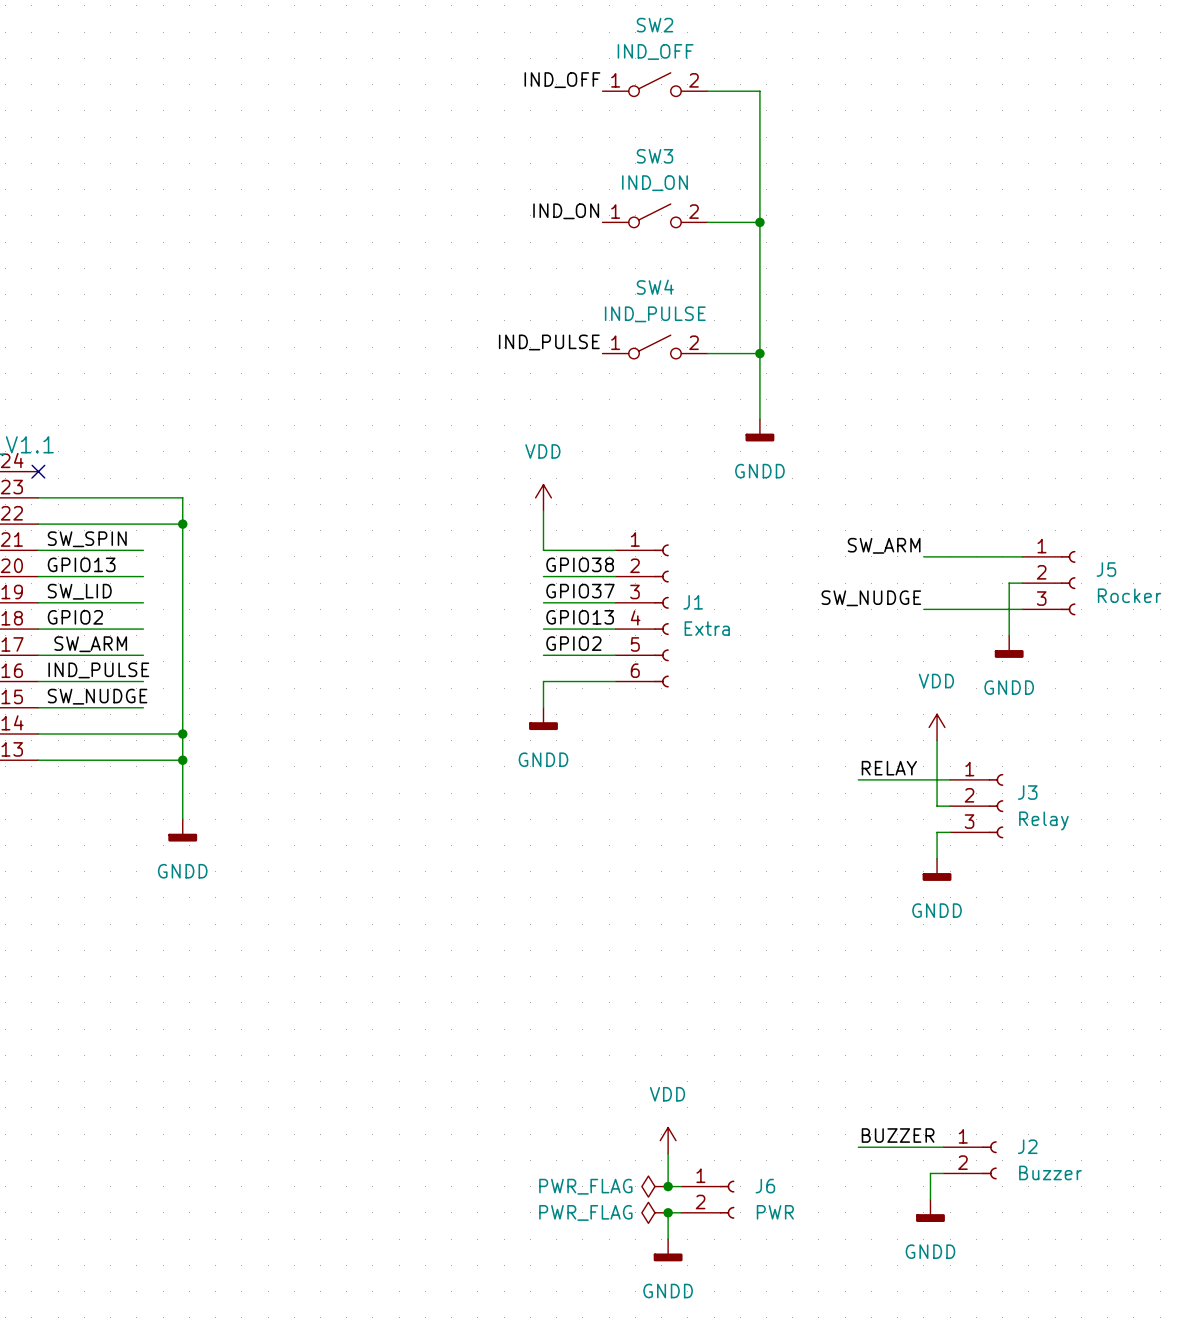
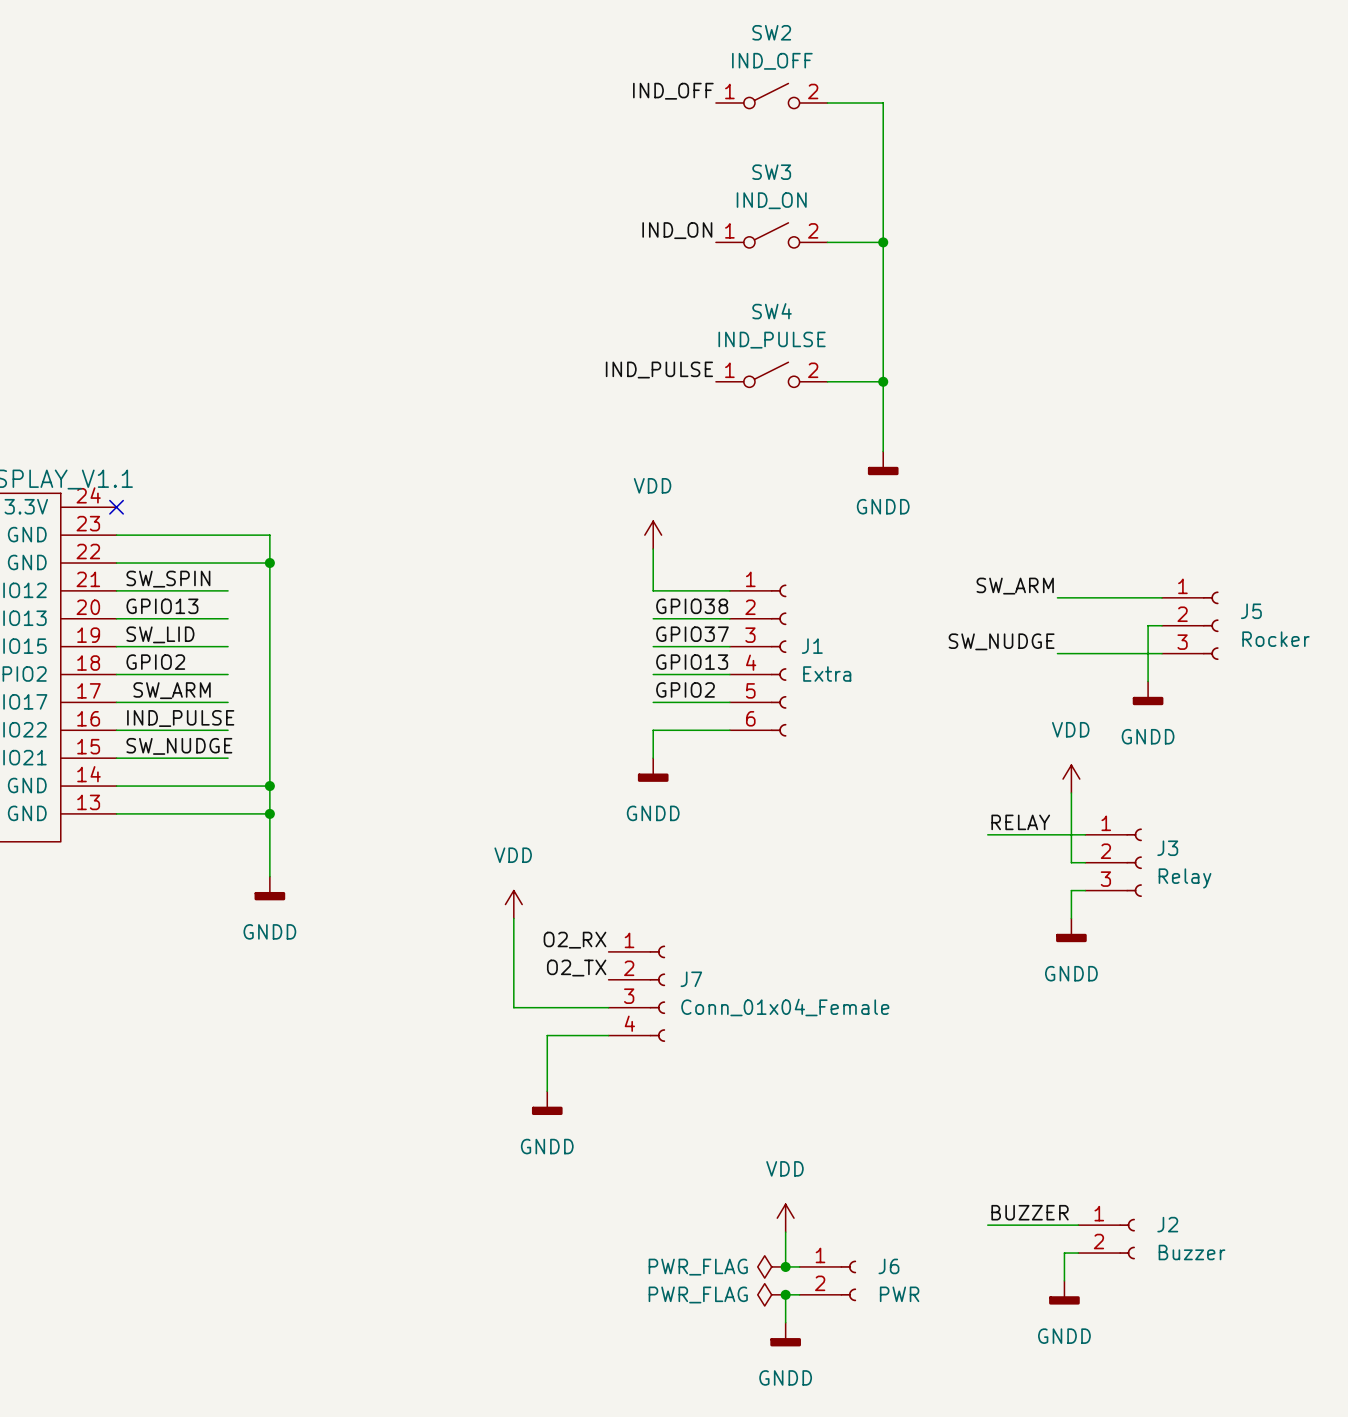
power symbol: none -> VDD (513, 904)
wire: none -> (513, 918) (513, 1007) (608, 1007)
label: none -> O2_RX (574, 940)
label: none -> O2_TX (576, 968)
J7: none -> Conn_01x04_Female (636, 993)
wire: none -> (608, 1035) (547, 1035) (547, 1091)
power symbol: none -> GNDD (547, 1103)

